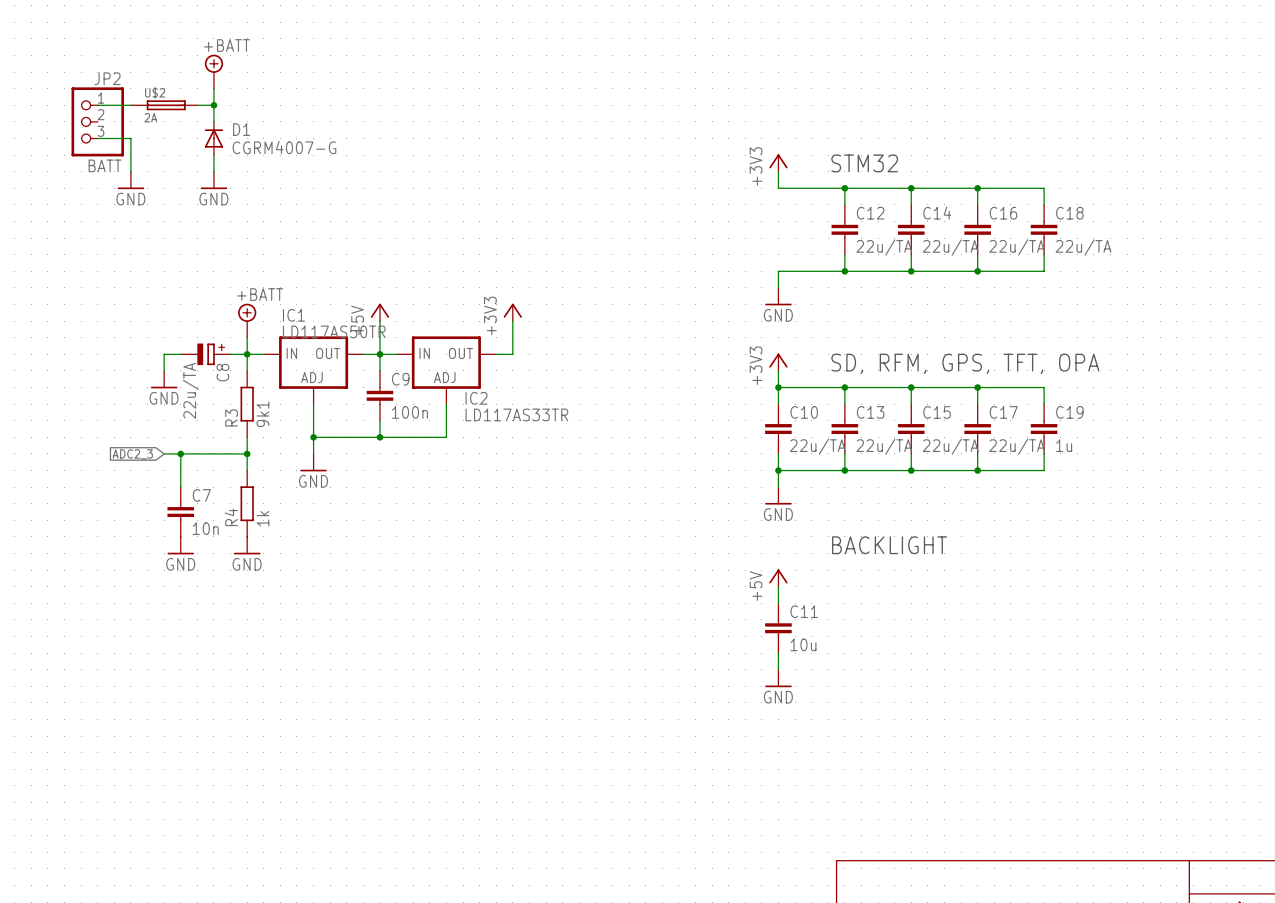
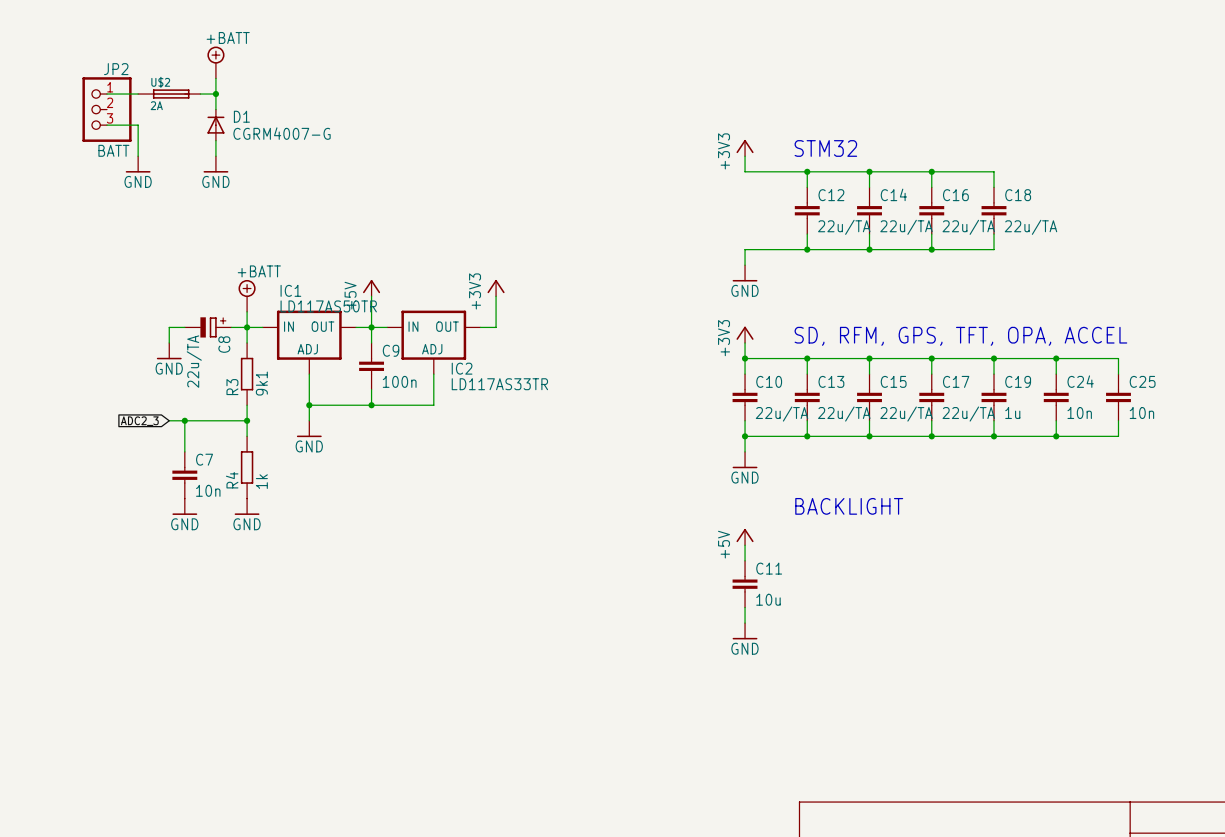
text: SD, RFM, GPS, TFT, OPA (965, 363) -> SD, RFM, GPS, TFT, OPA, ACCEL (960, 336)
wire: none -> (994, 358) (1118, 358) (1118, 374)
junction: none -> (994, 358)
wire: none -> (1056, 358) (1056, 374)
junction: none -> (1056, 358)
C24: none -> 10n (1056, 397)
C25: none -> 10n (1118, 397)
wire: none -> (1056, 420) (1056, 436)
wire: none -> (1118, 420) (1118, 436) (994, 436)
junction: none -> (994, 436)
junction: none -> (1056, 436)

